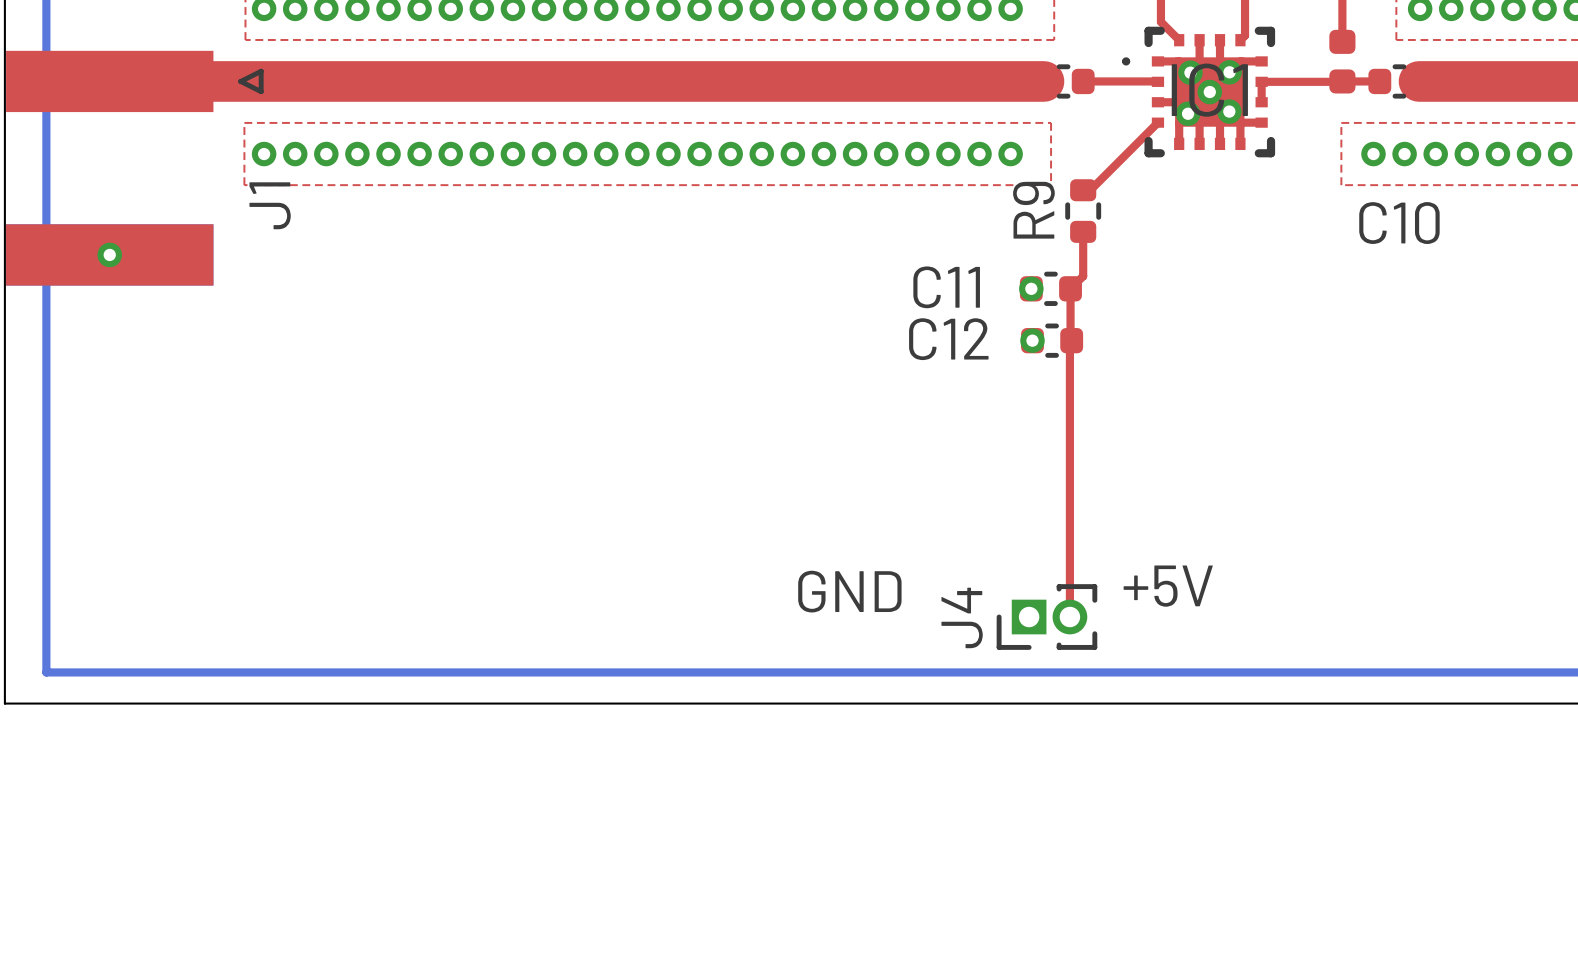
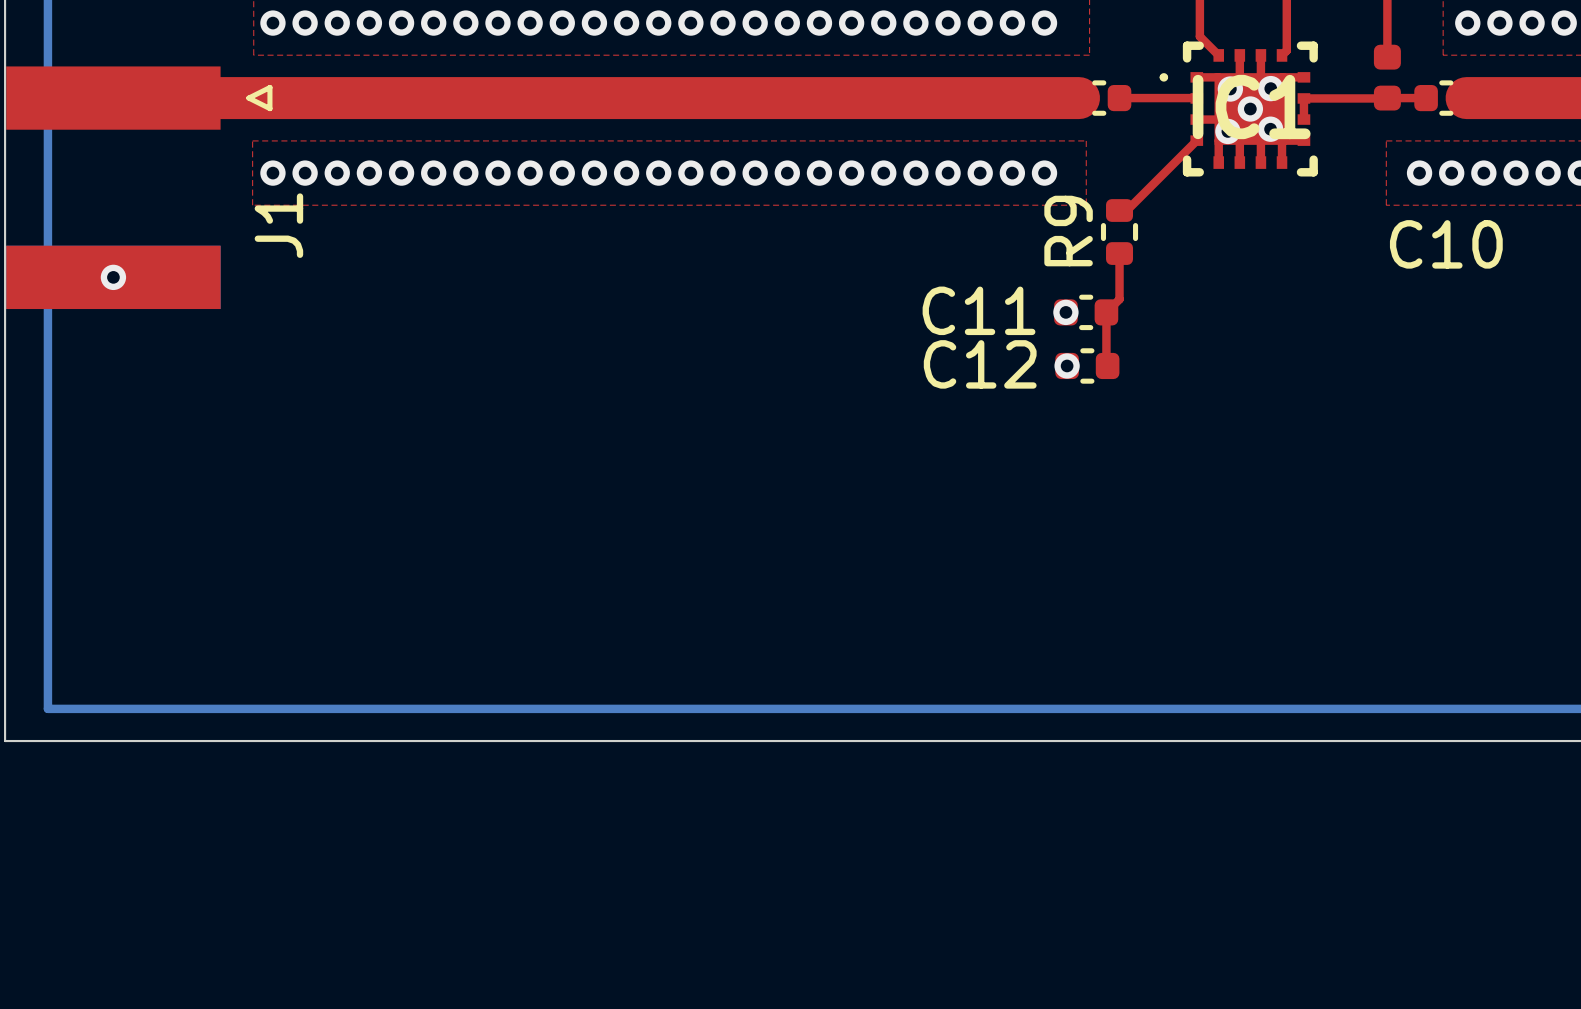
top track: (1071, 340) (1069, 342) (1069, 617) -> none
text: +5V (1168, 586) -> none
text: GND (849, 591) -> none
J4: (1046, 617) -> none

